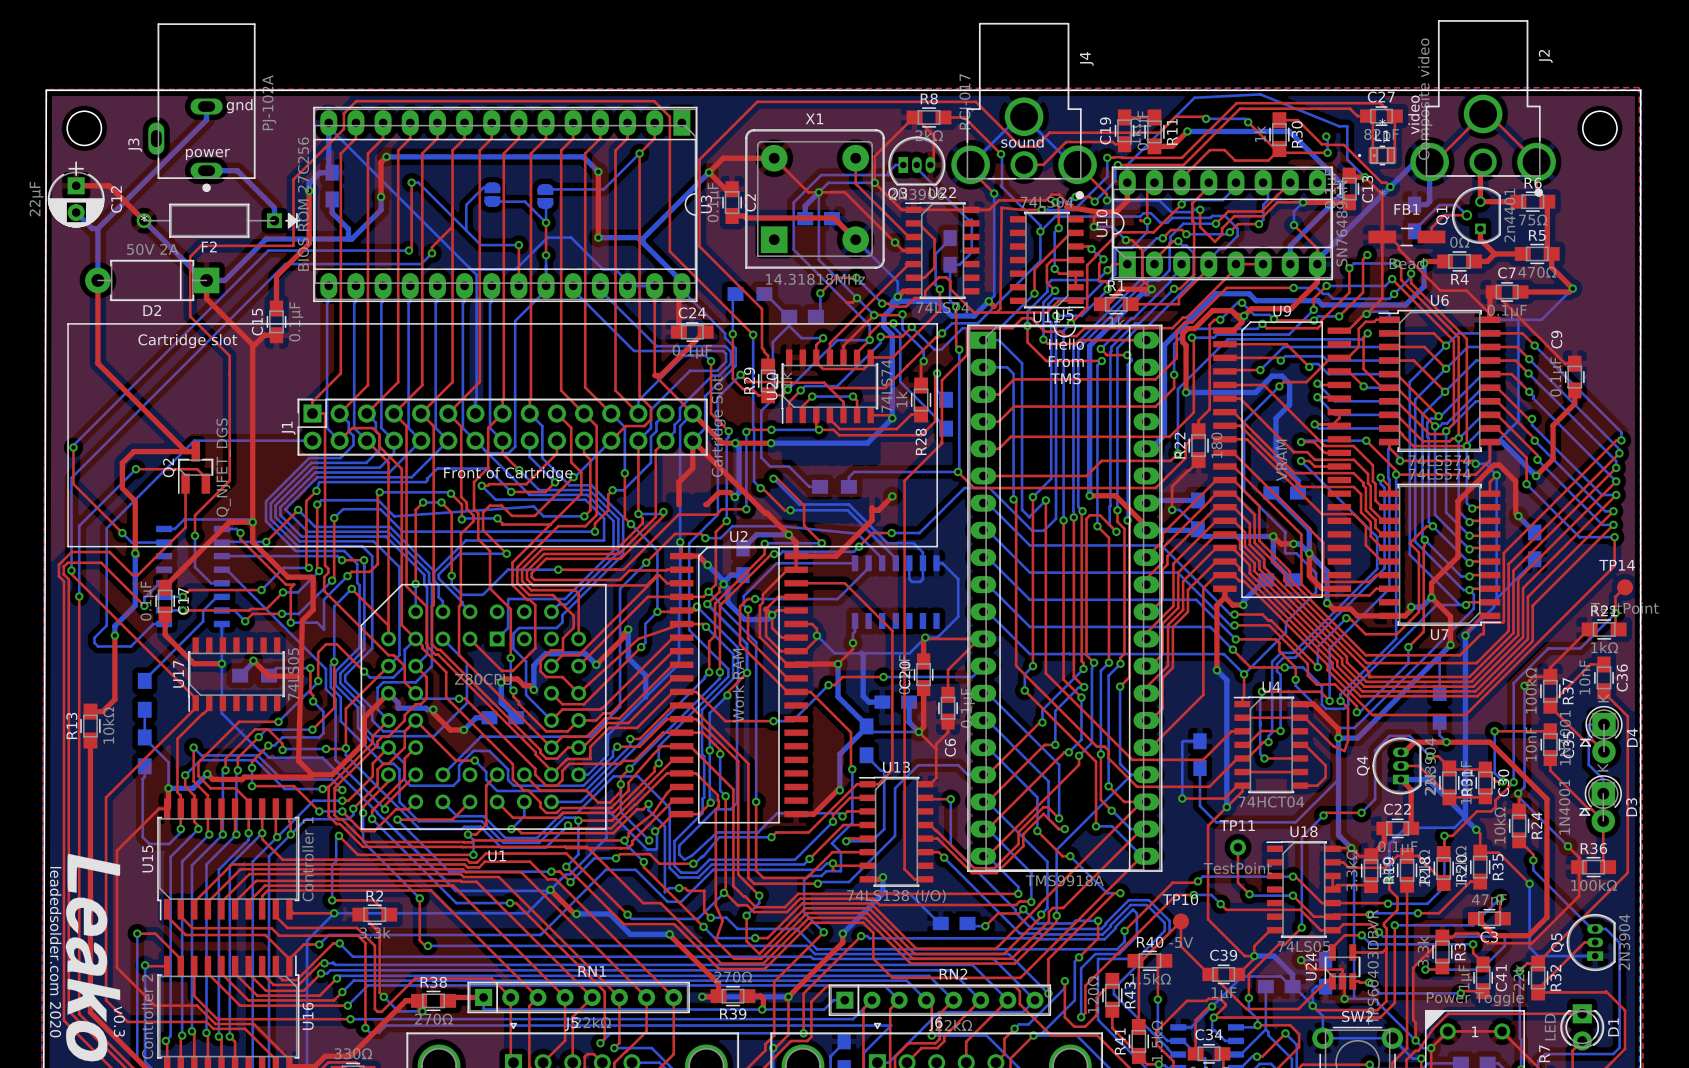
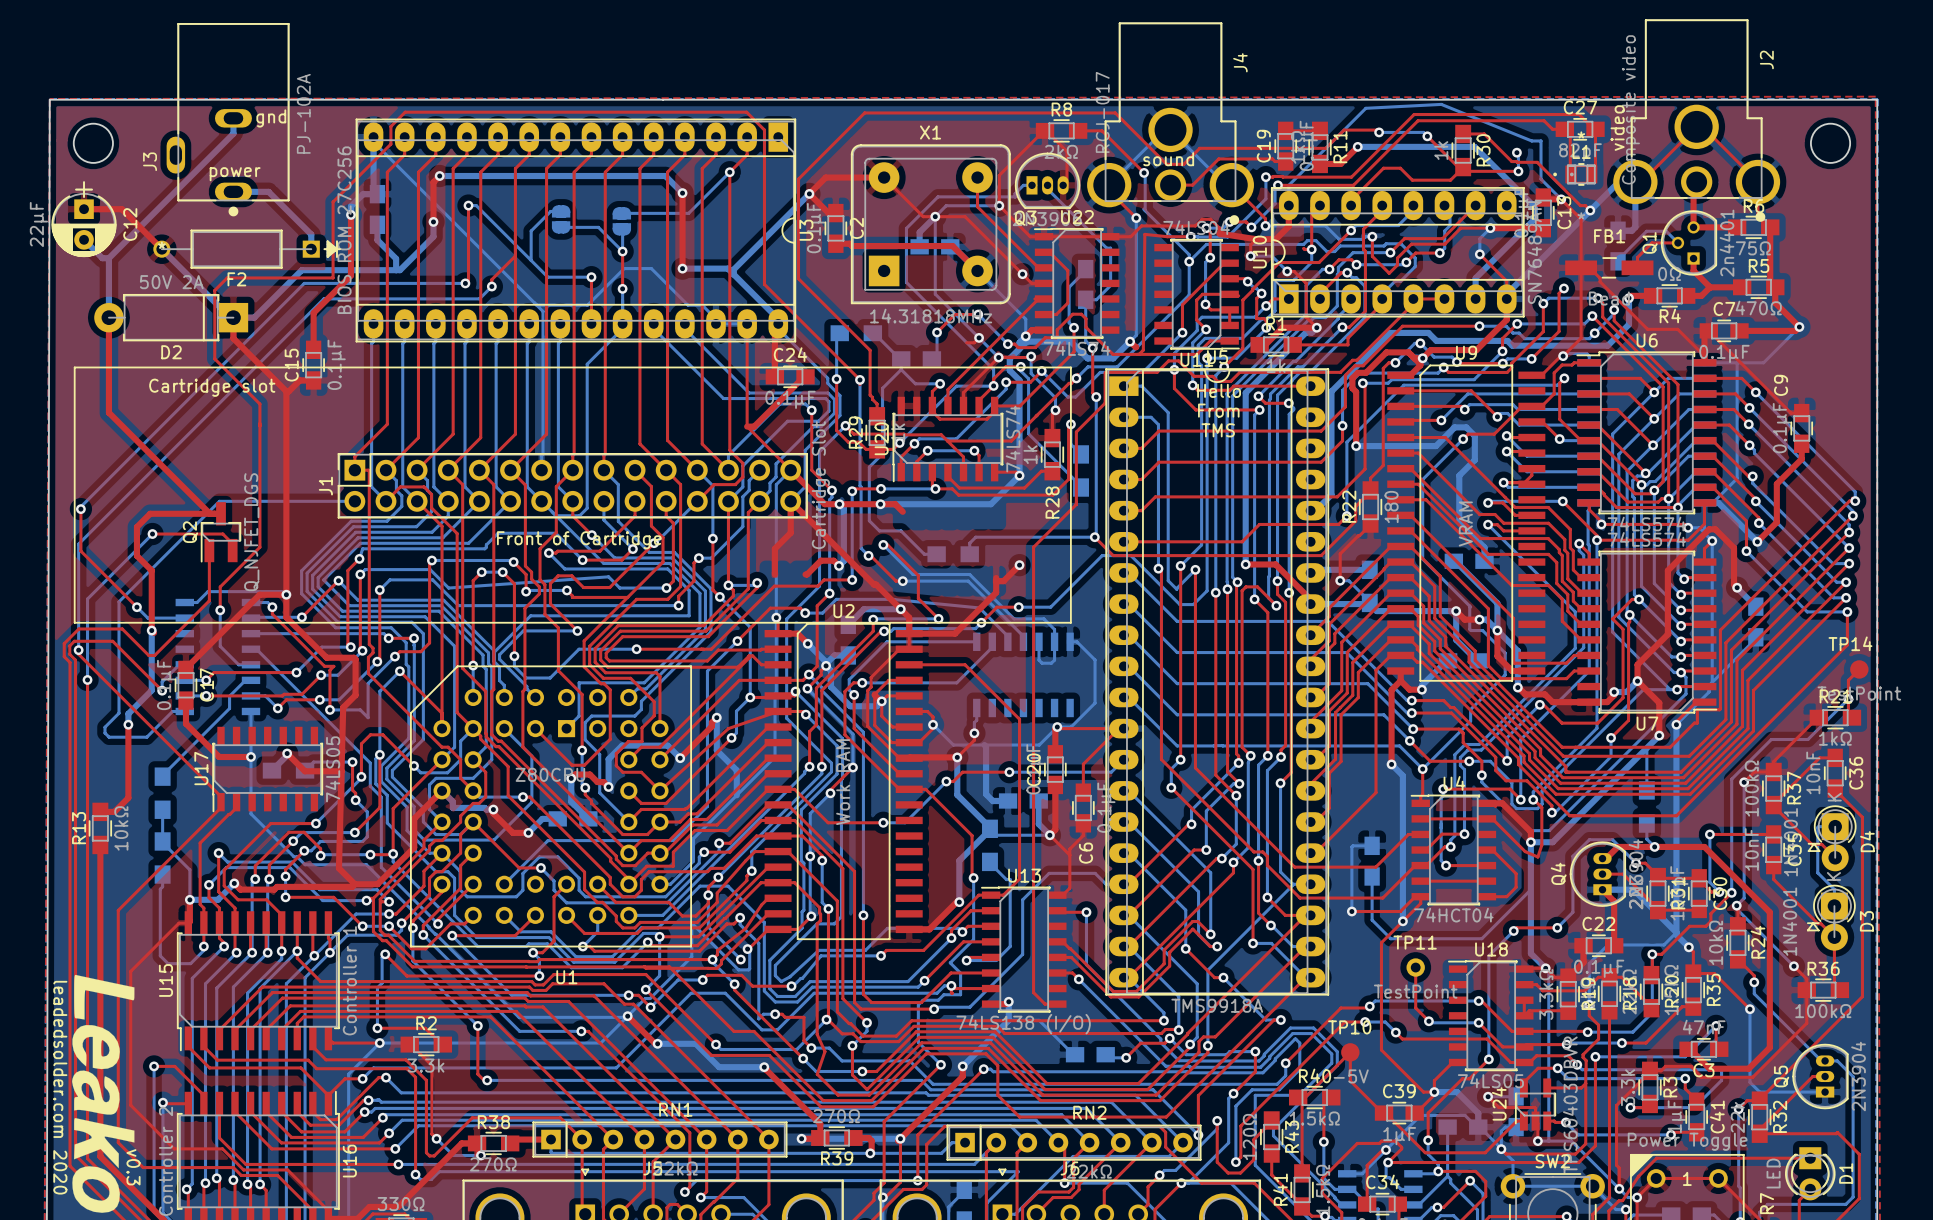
top track: none -> (880, 504) (895, 504) (902, 511)

